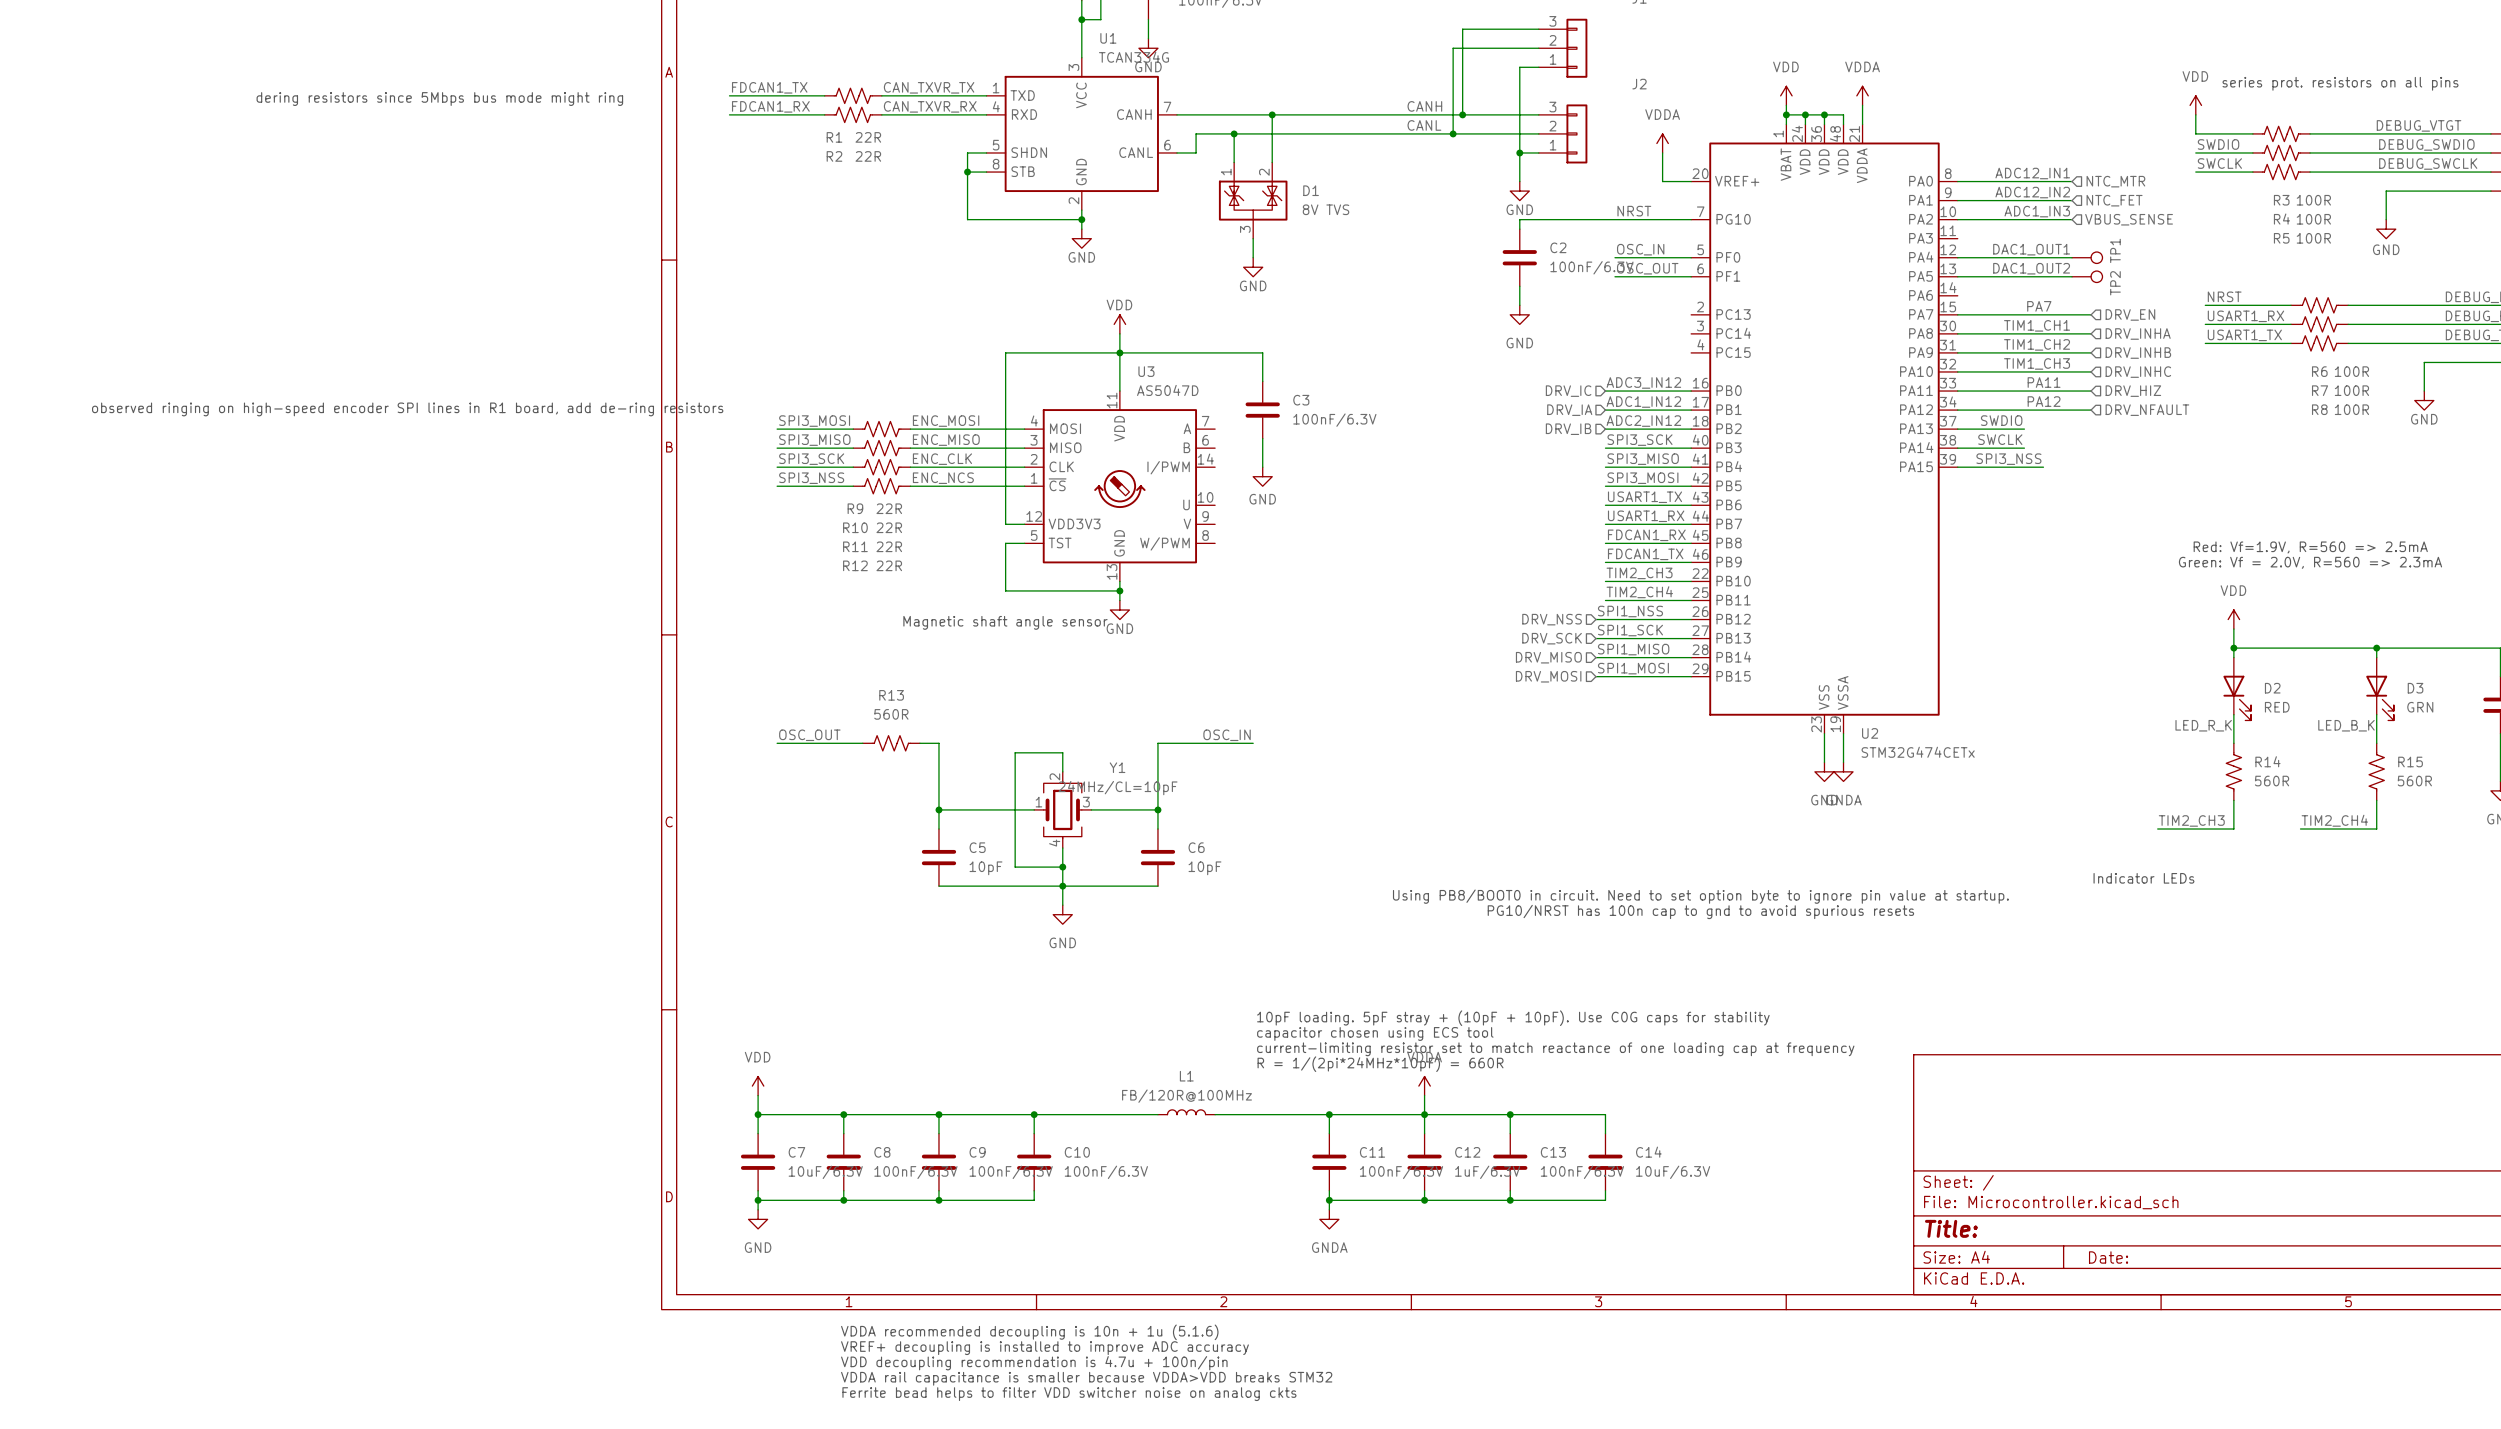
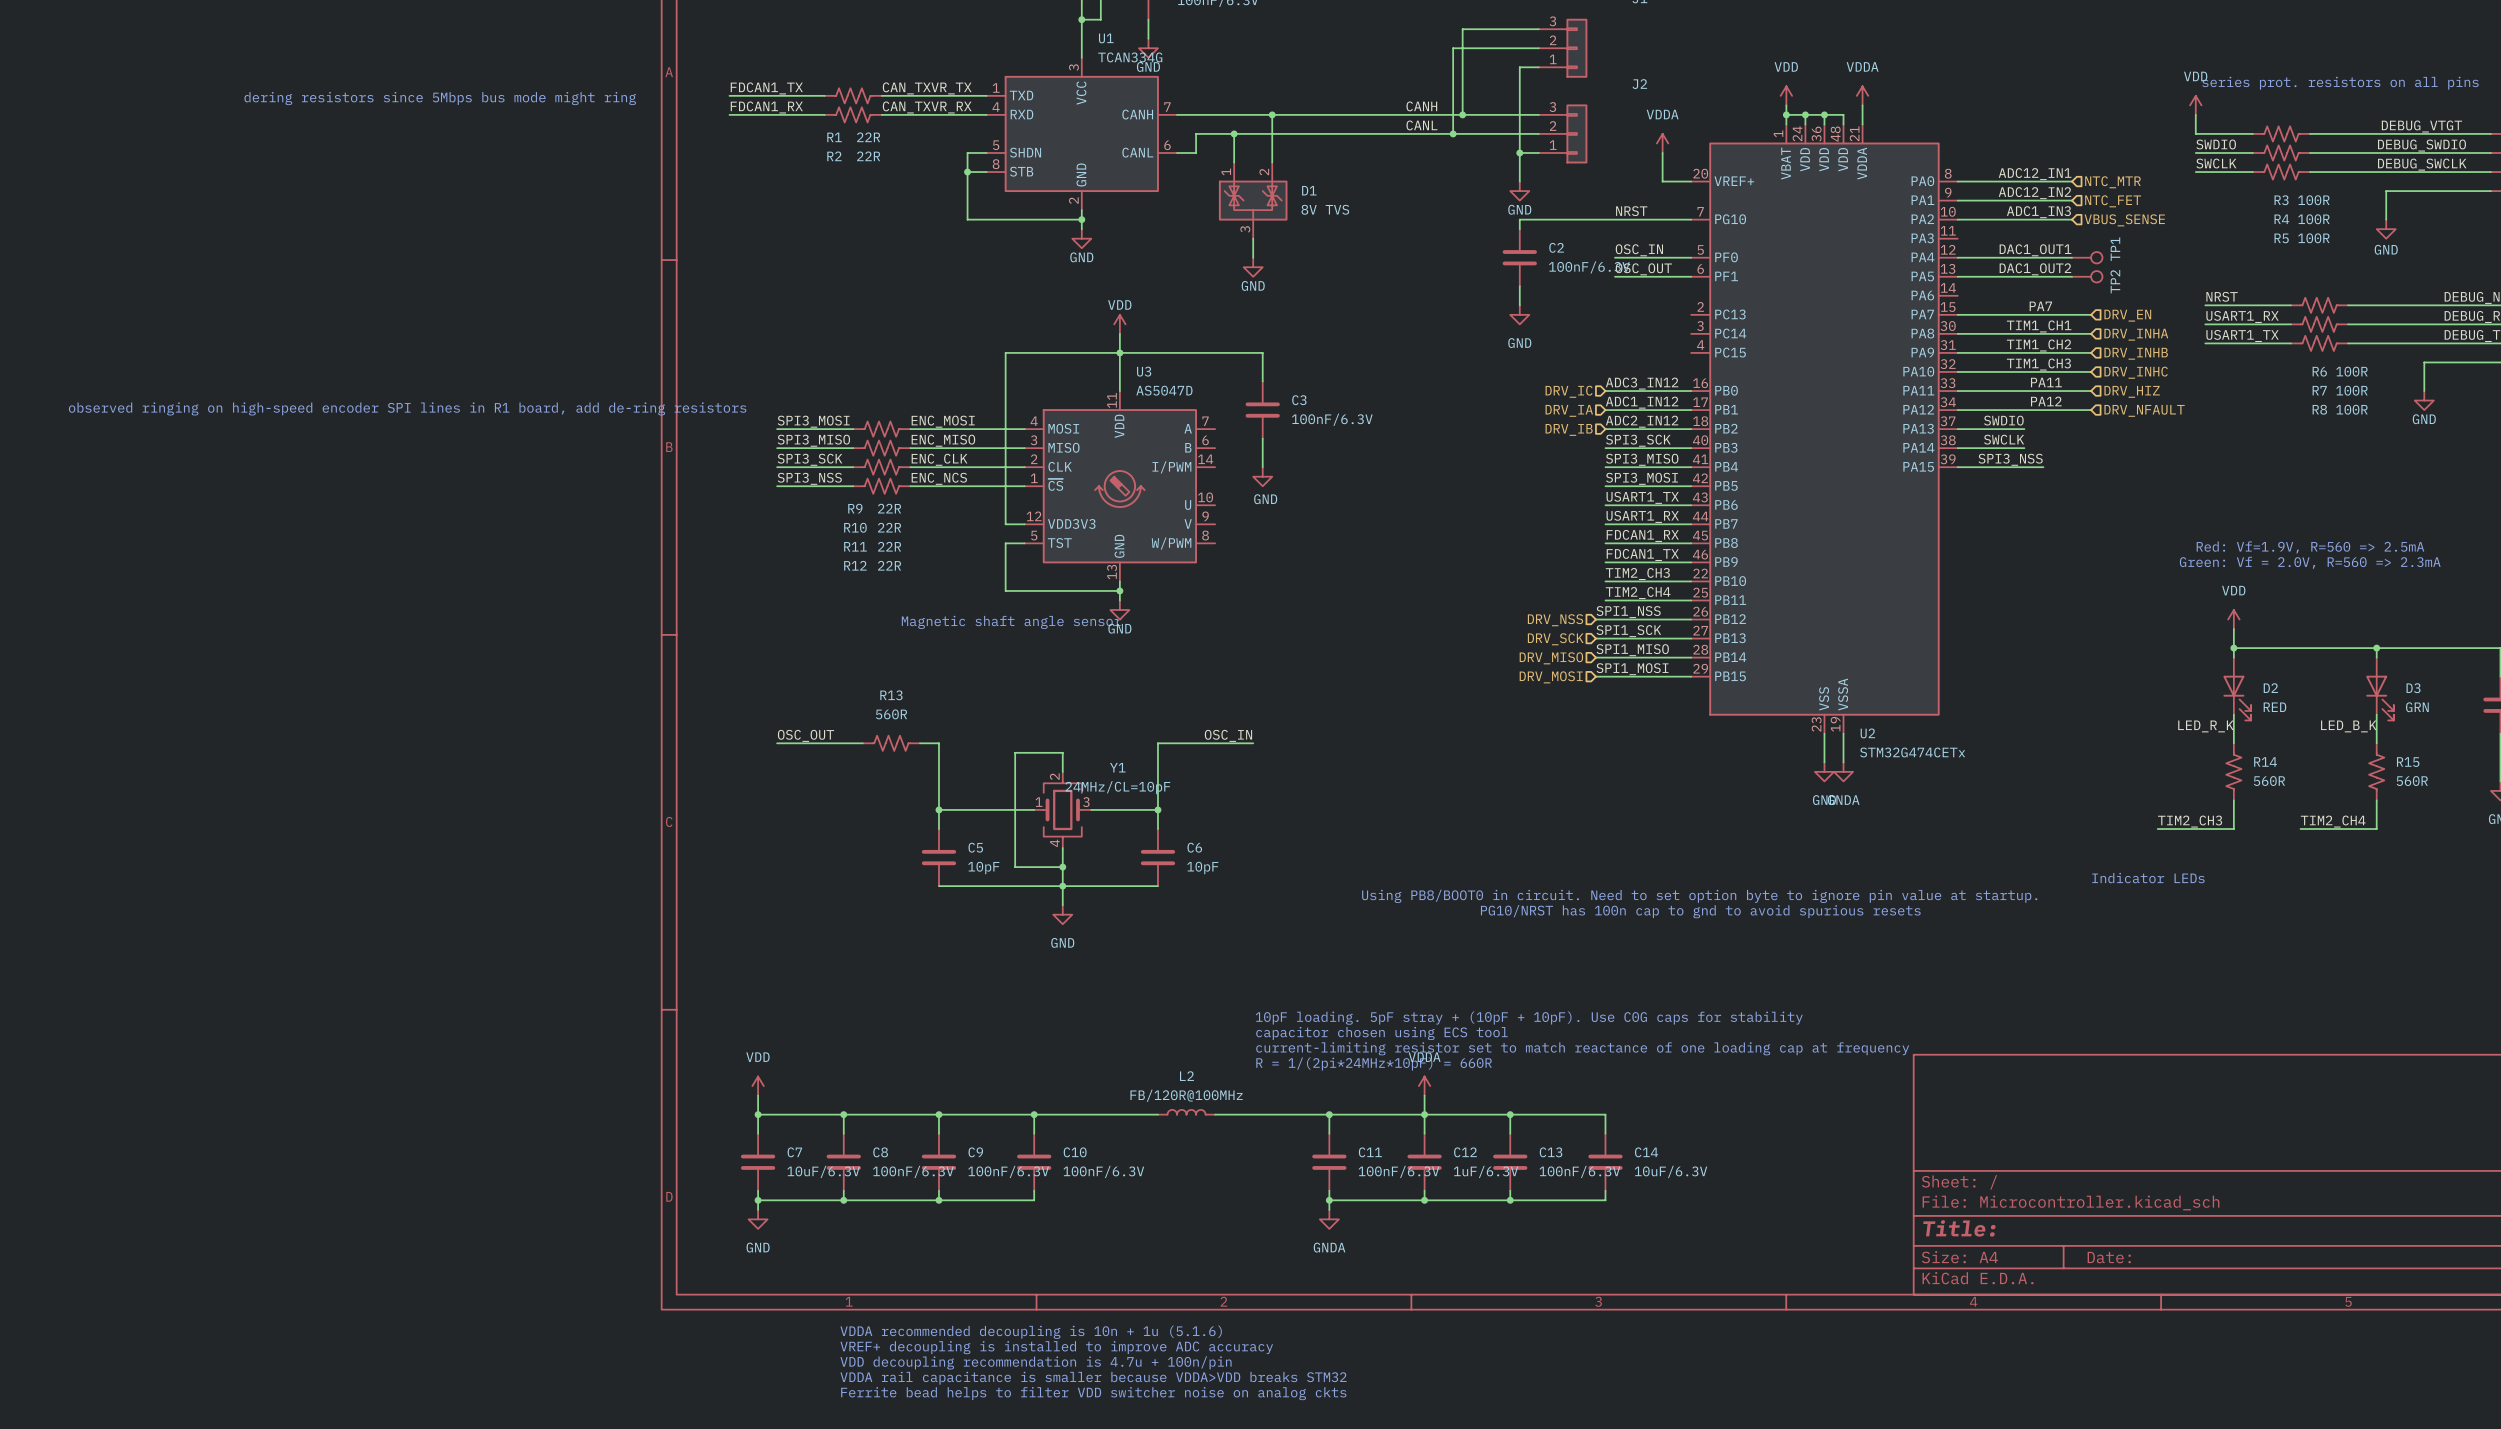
L1 name: L1 (1186, 1076) -> L2 (1186, 1076)

